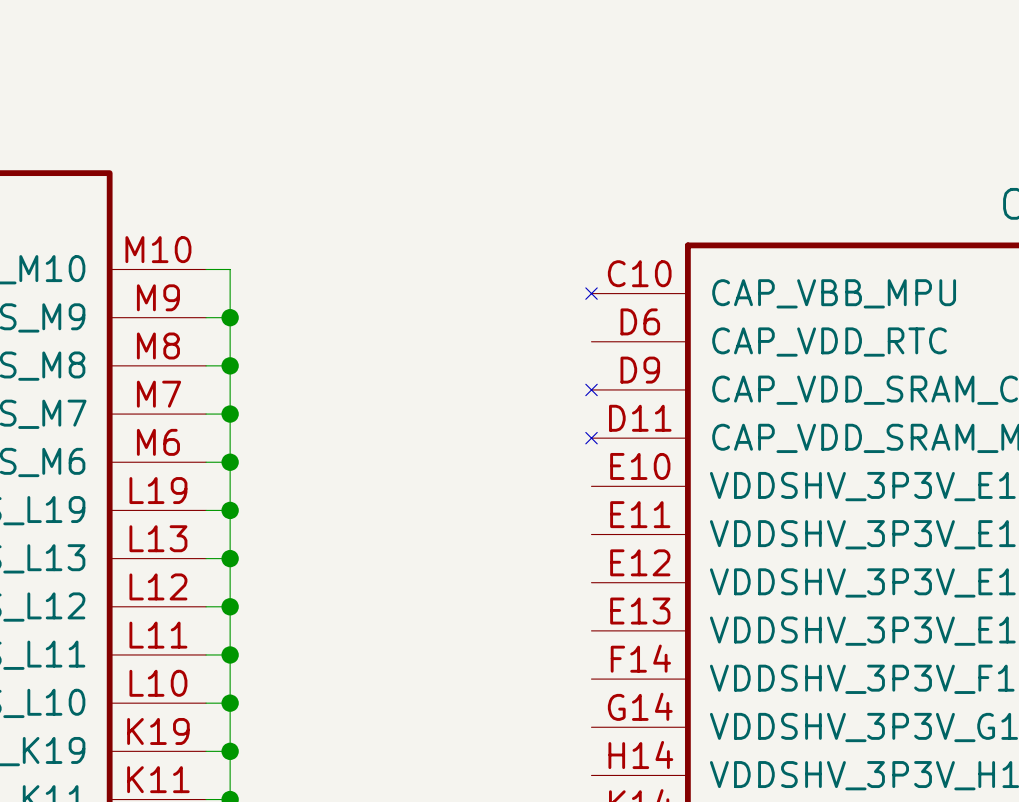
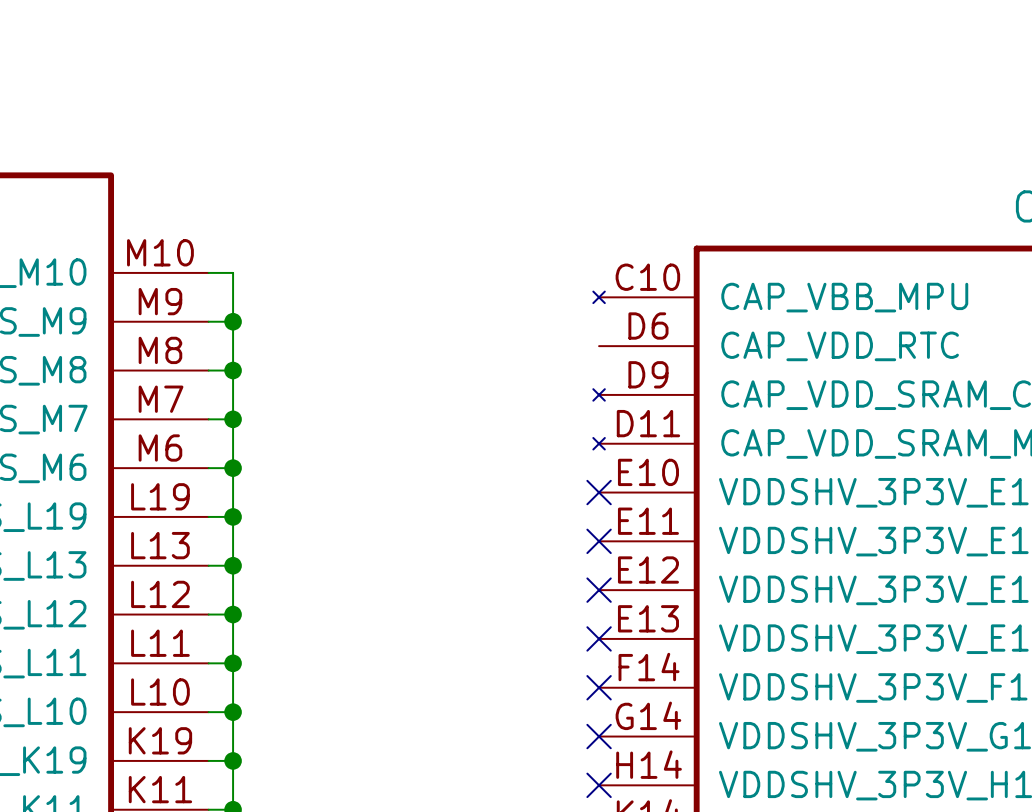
no-connect mark: none -> (599, 492)
no-connect mark: none -> (599, 541)
no-connect mark: none -> (599, 590)
no-connect mark: none -> (599, 638)
no-connect mark: none -> (599, 687)
no-connect mark: none -> (599, 736)
no-connect mark: none -> (599, 785)

